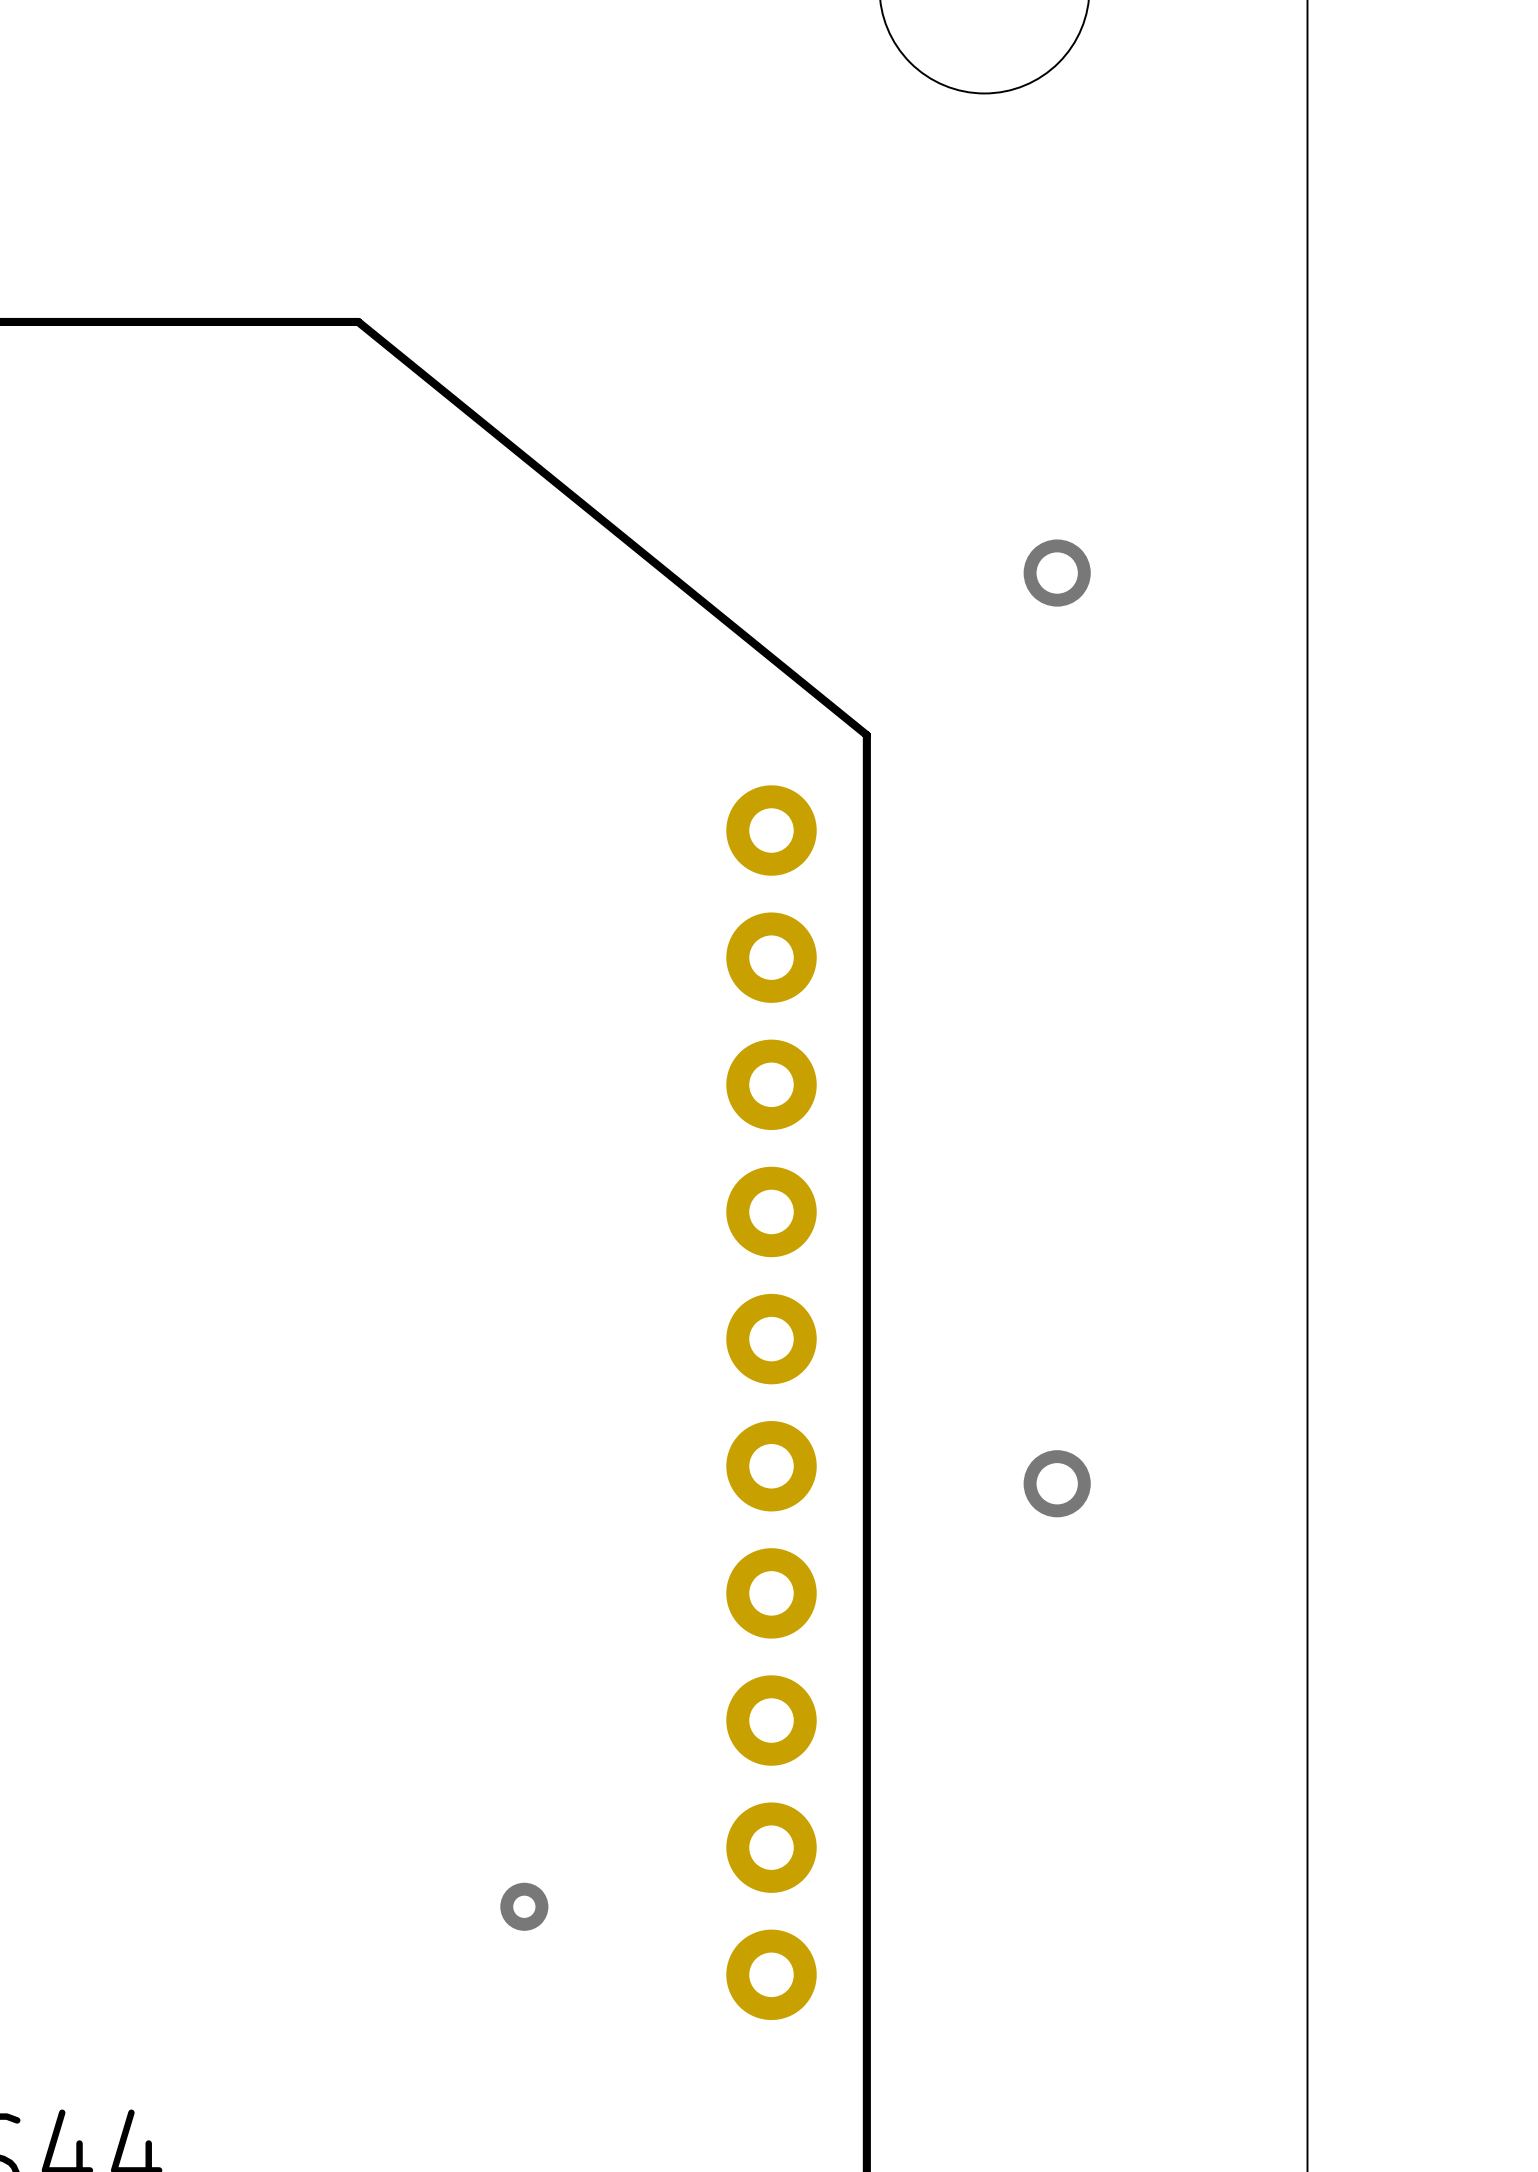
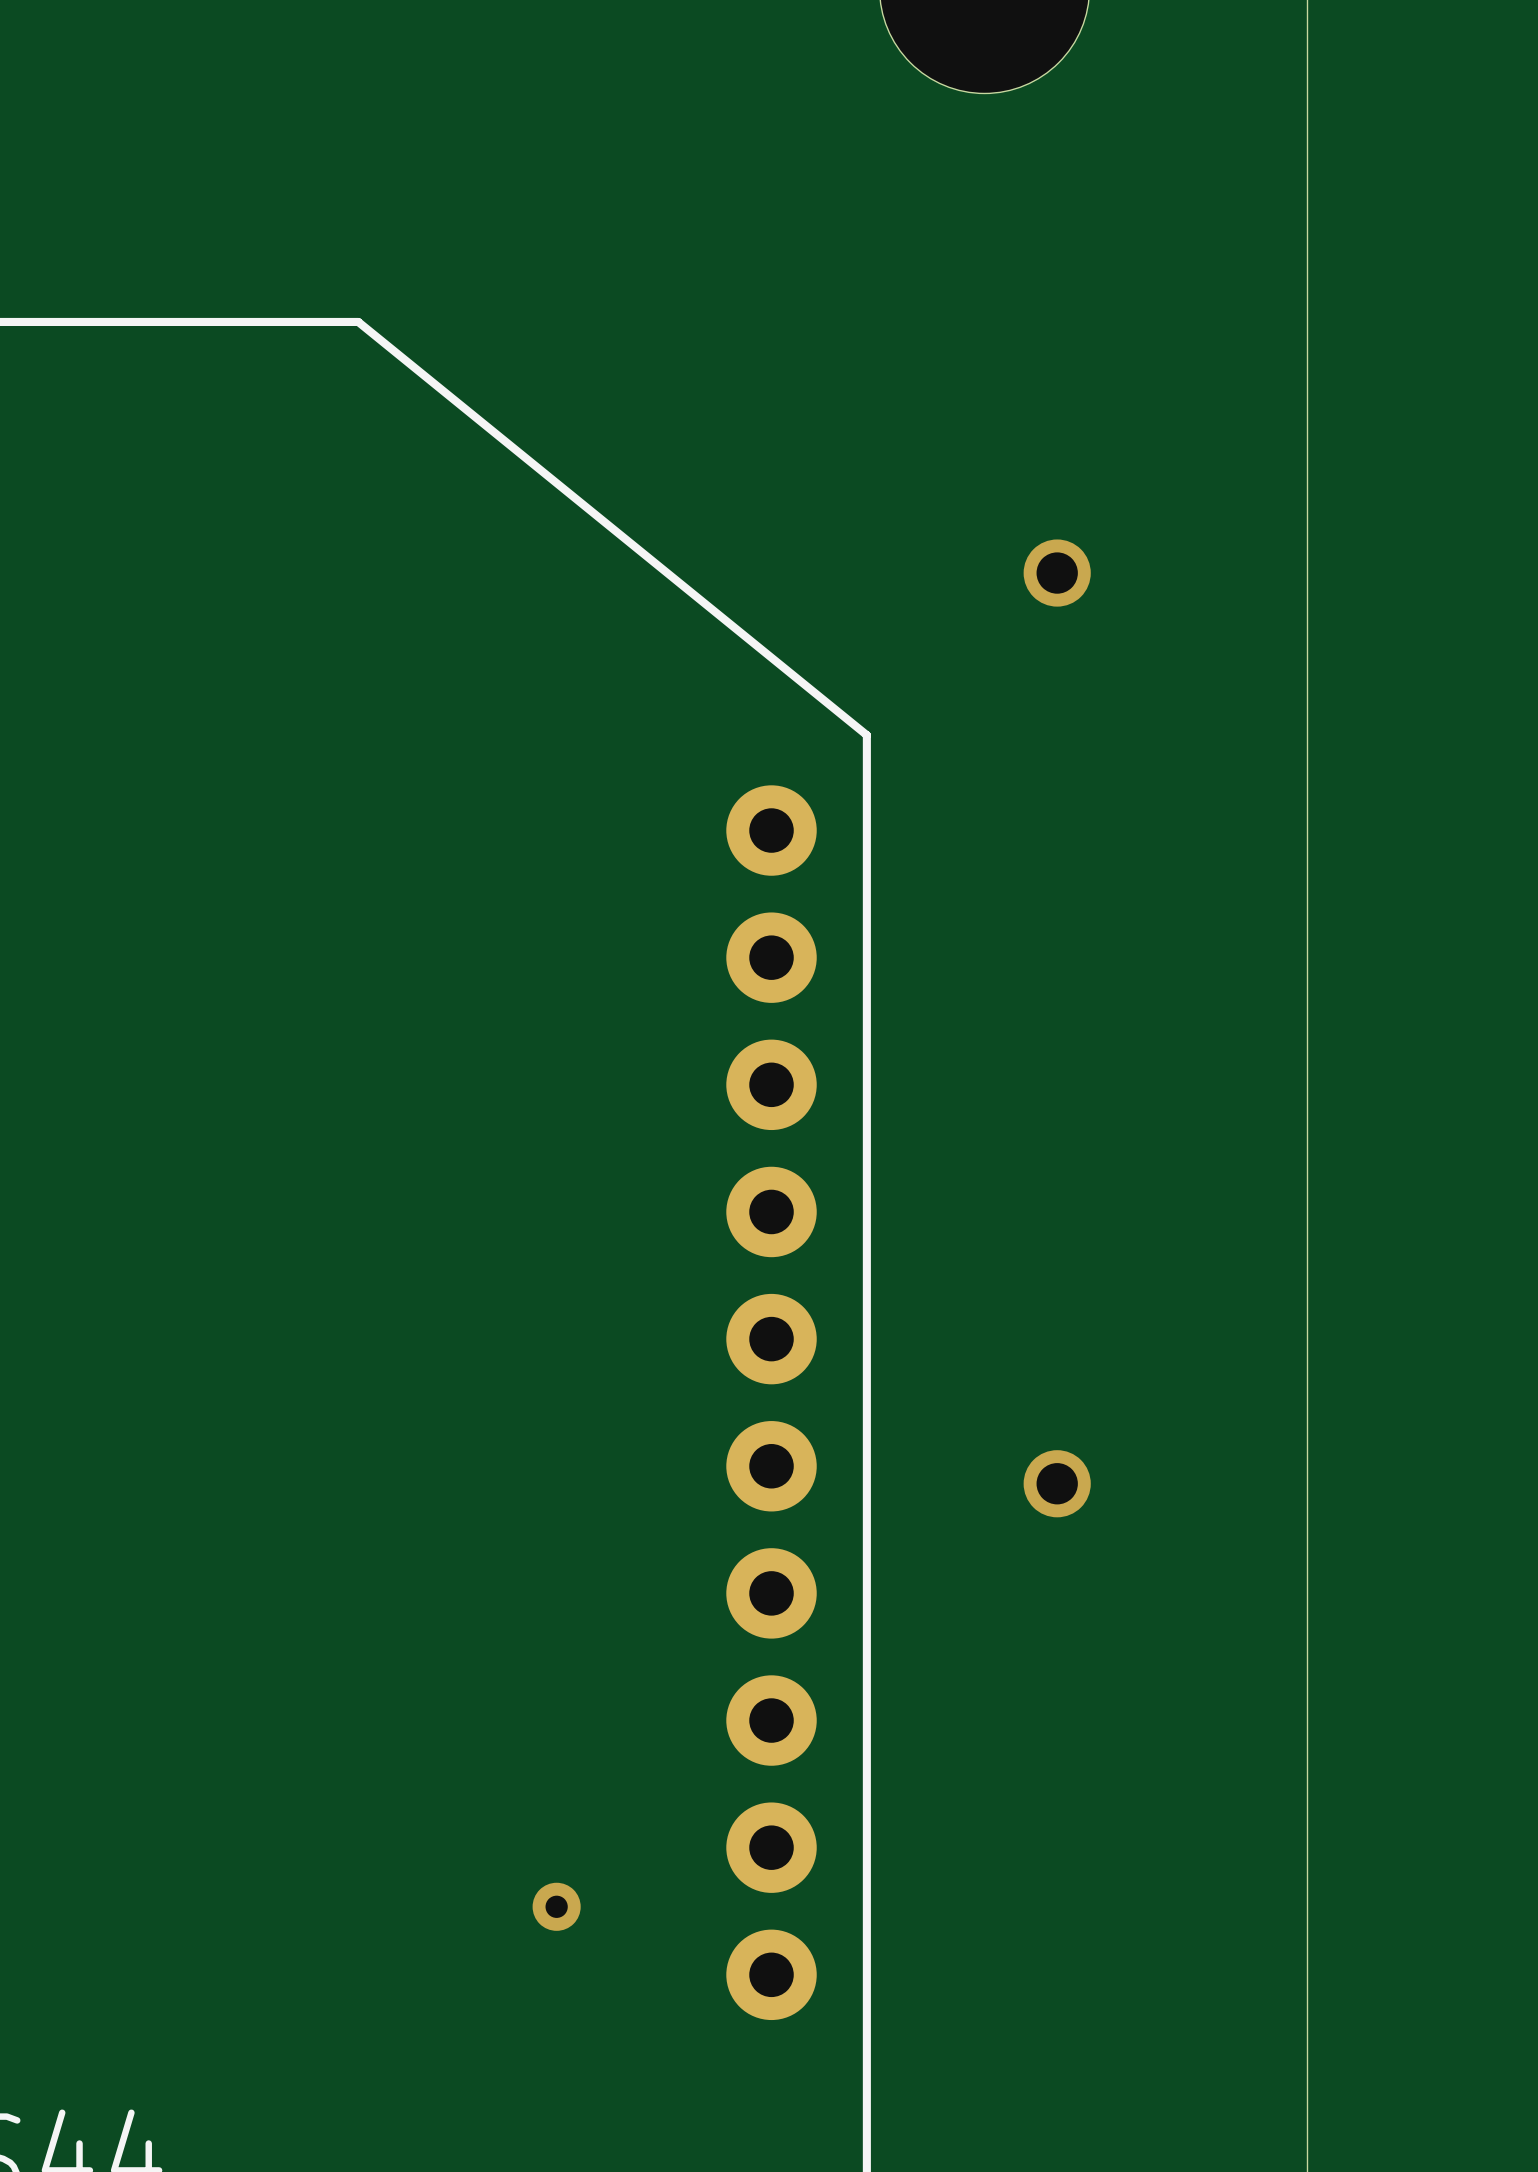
via position: (524, 1906) -> (556, 1906)

